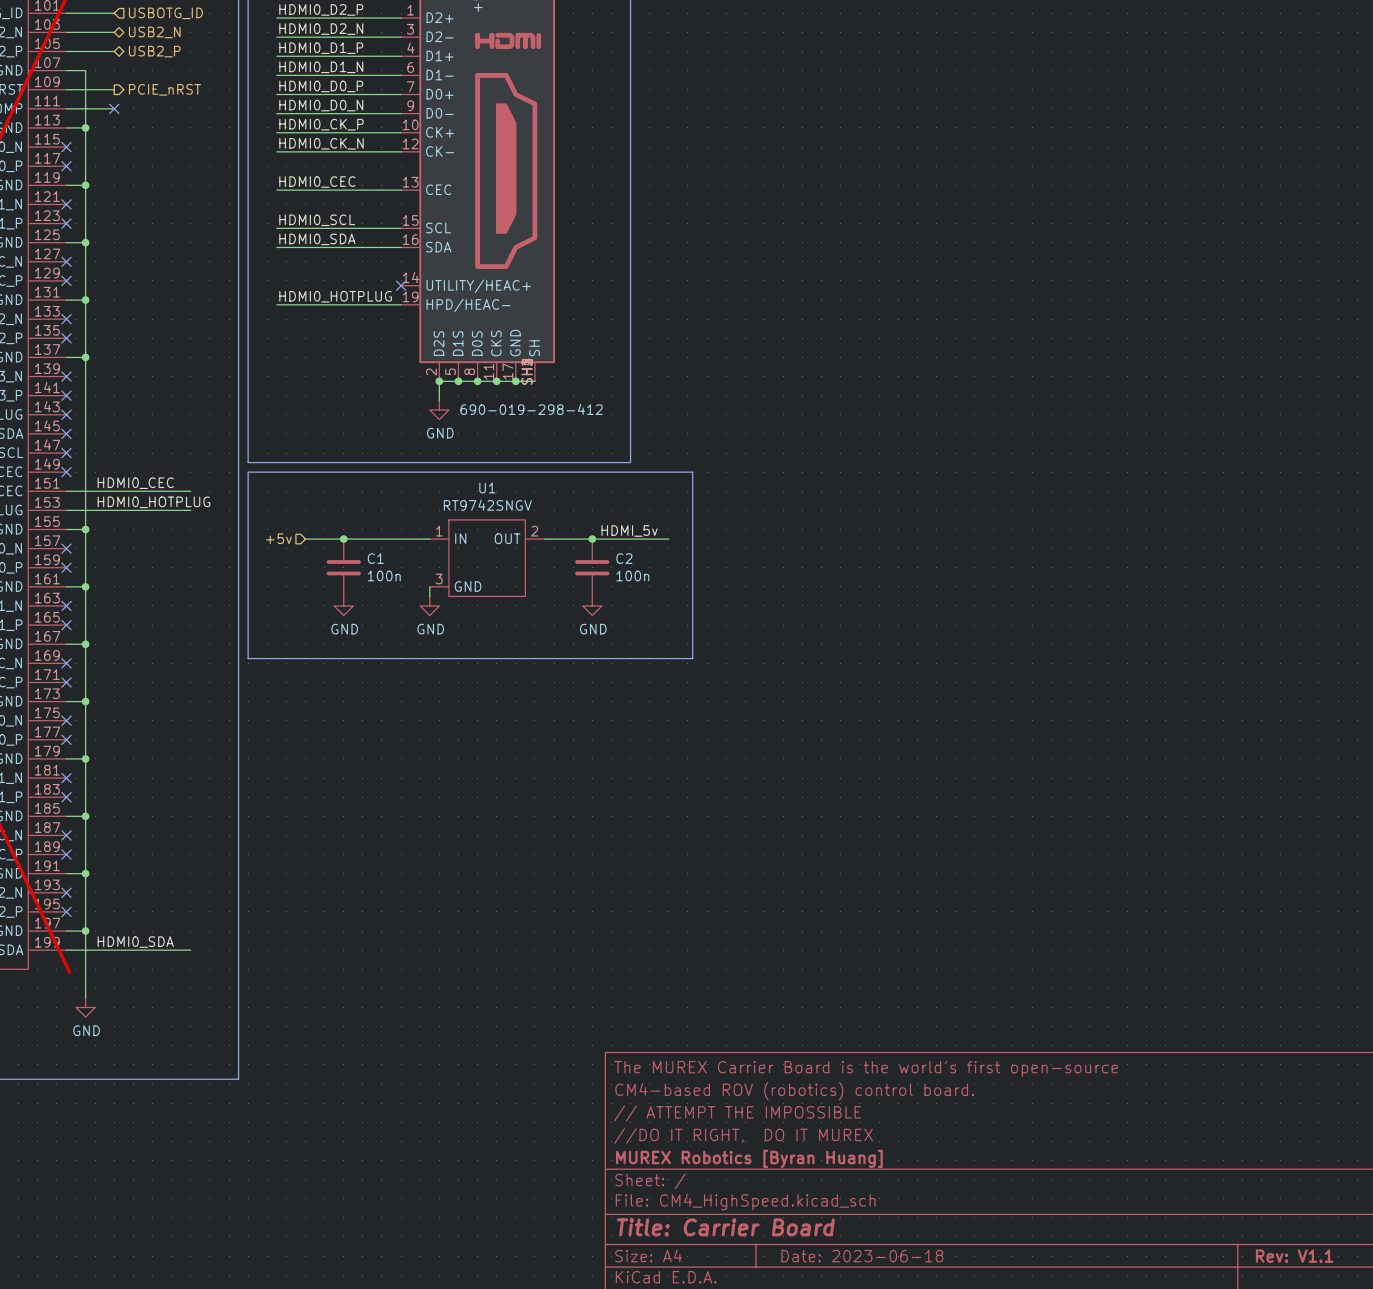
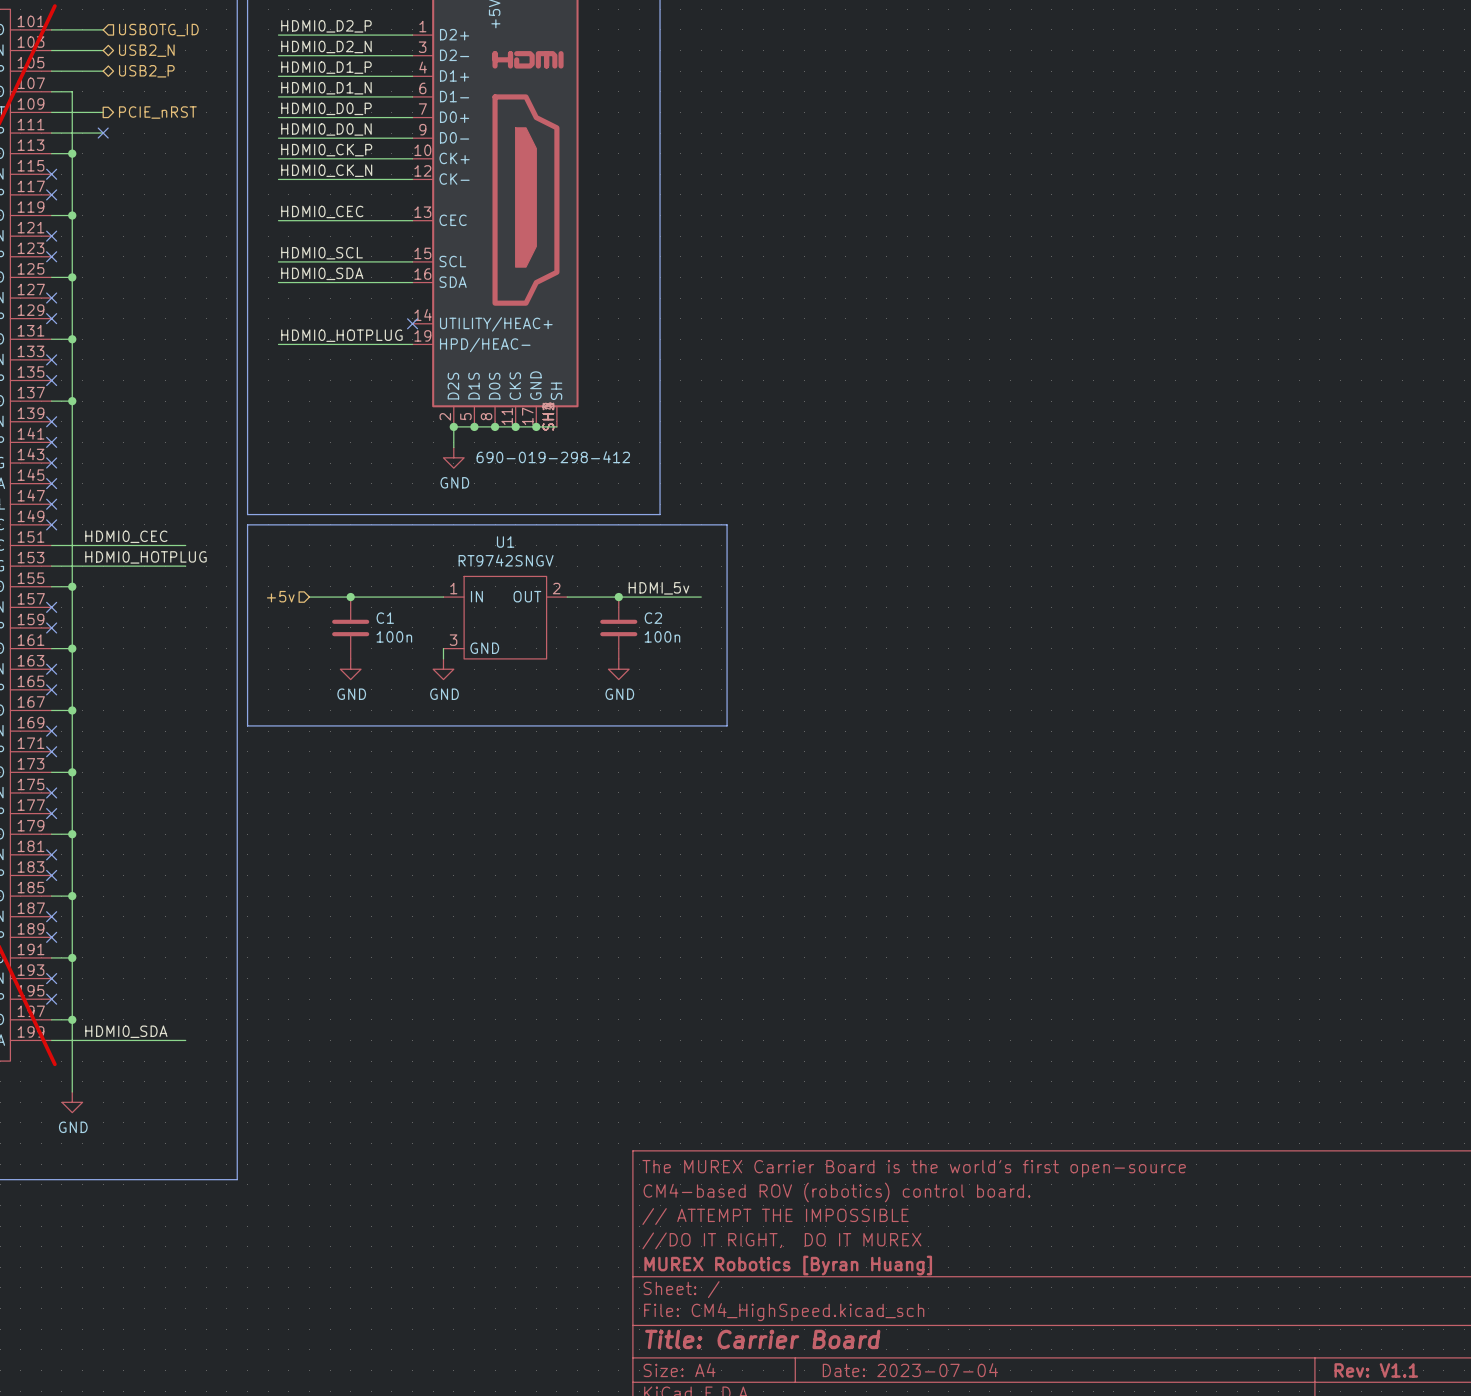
title block: Date: 2023-06-18 (862, 1256) -> Date: 2023-07-04 (910, 1370)

